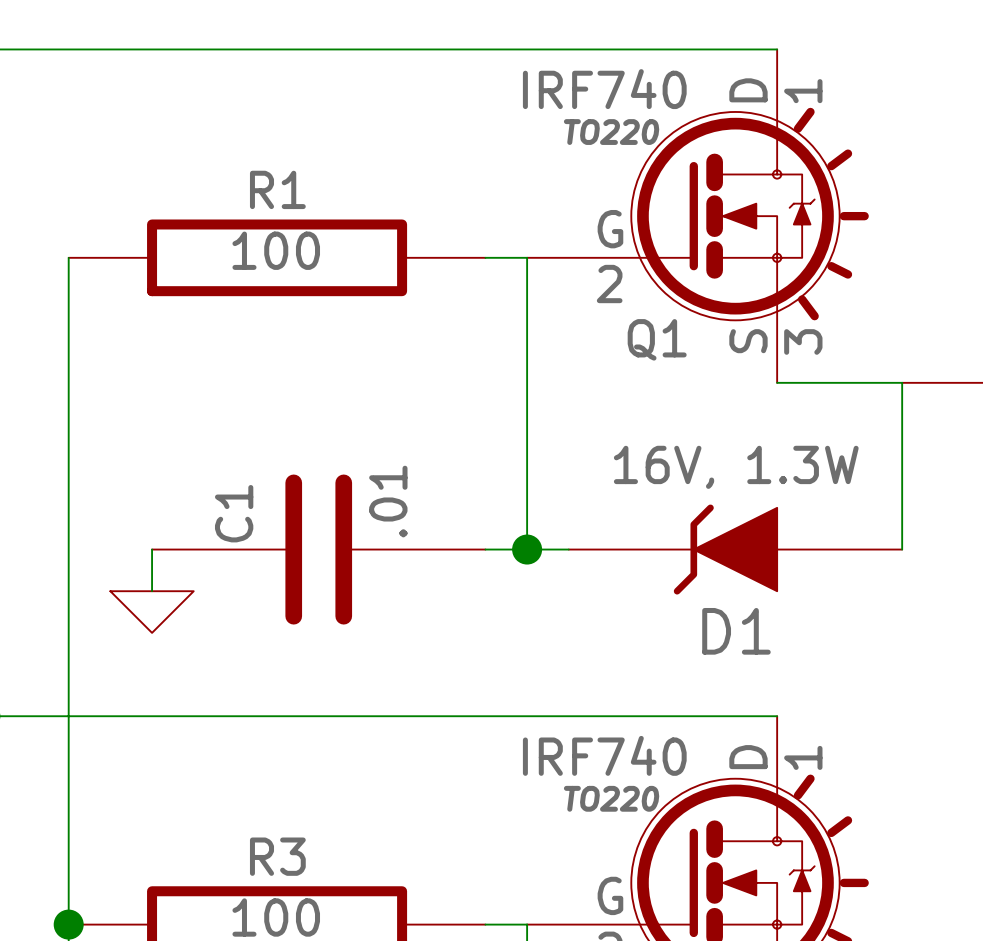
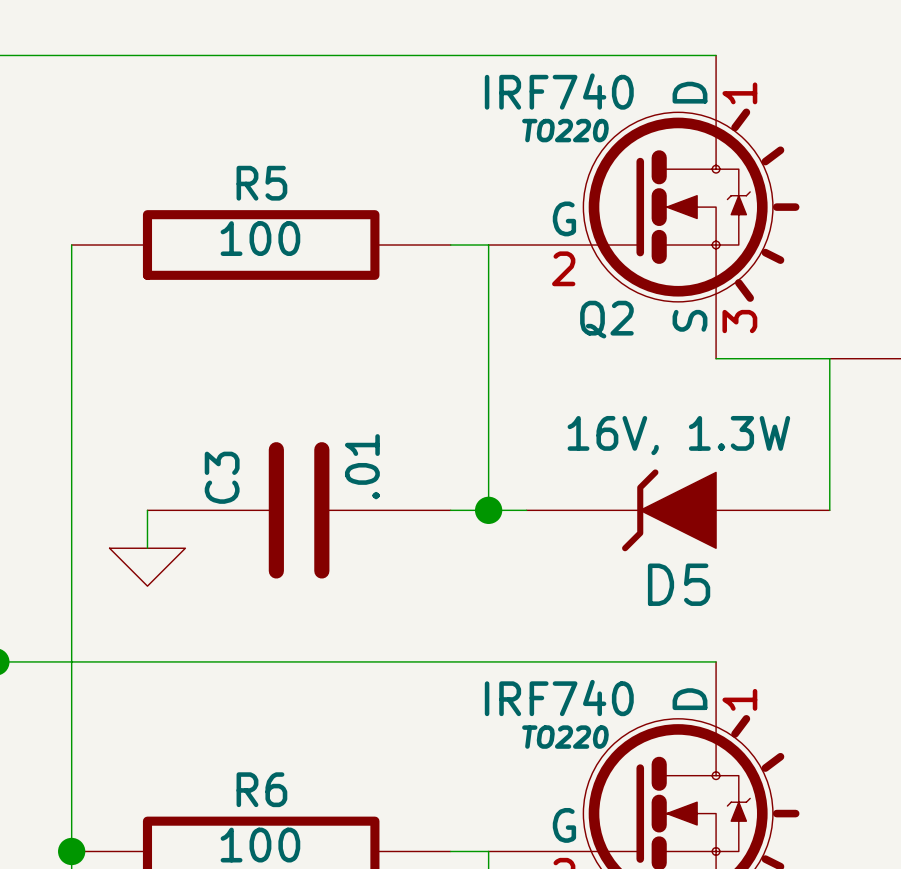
R1 name: R1 (277, 189) -> R5 (261, 183)
Q1 name: Q1 (657, 339) -> Q2 (606, 319)
C1 name: C1 (234, 513) -> C3 (222, 477)
D1 name: D1 (736, 631) -> D5 (679, 584)
R3 name: R3 (277, 856) -> R6 (261, 789)

